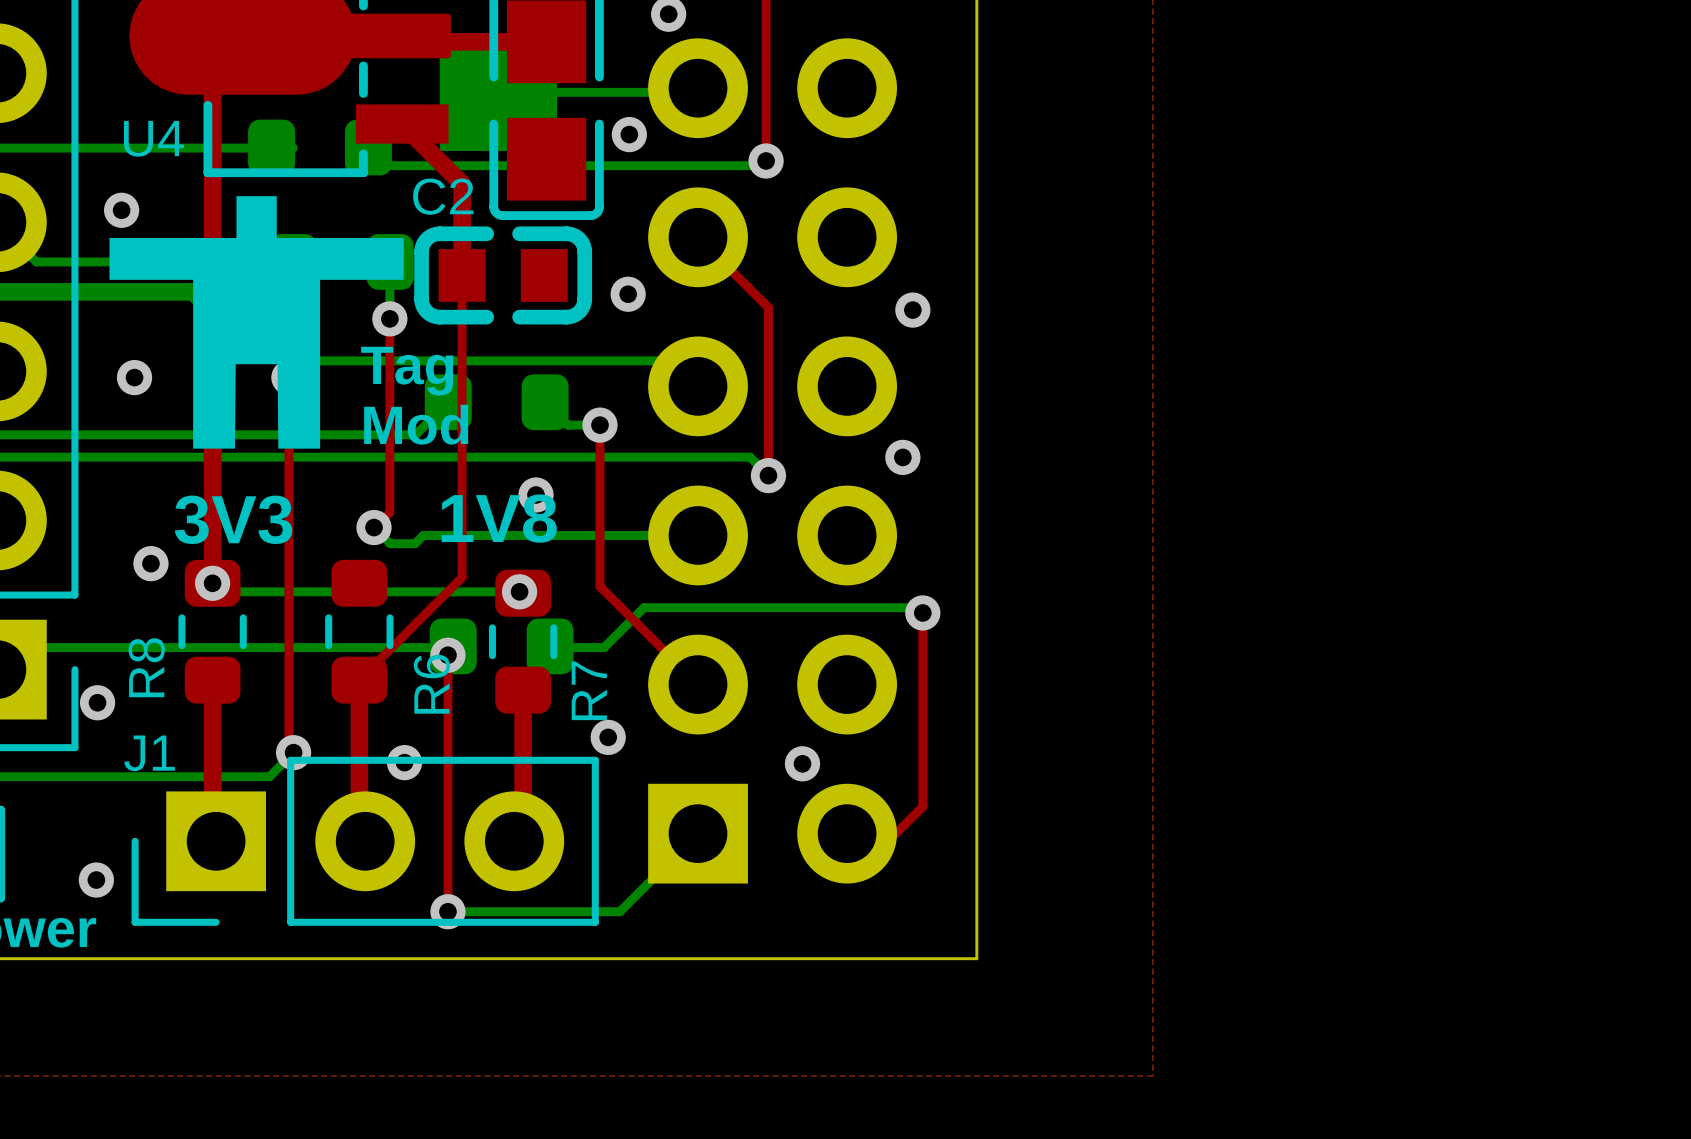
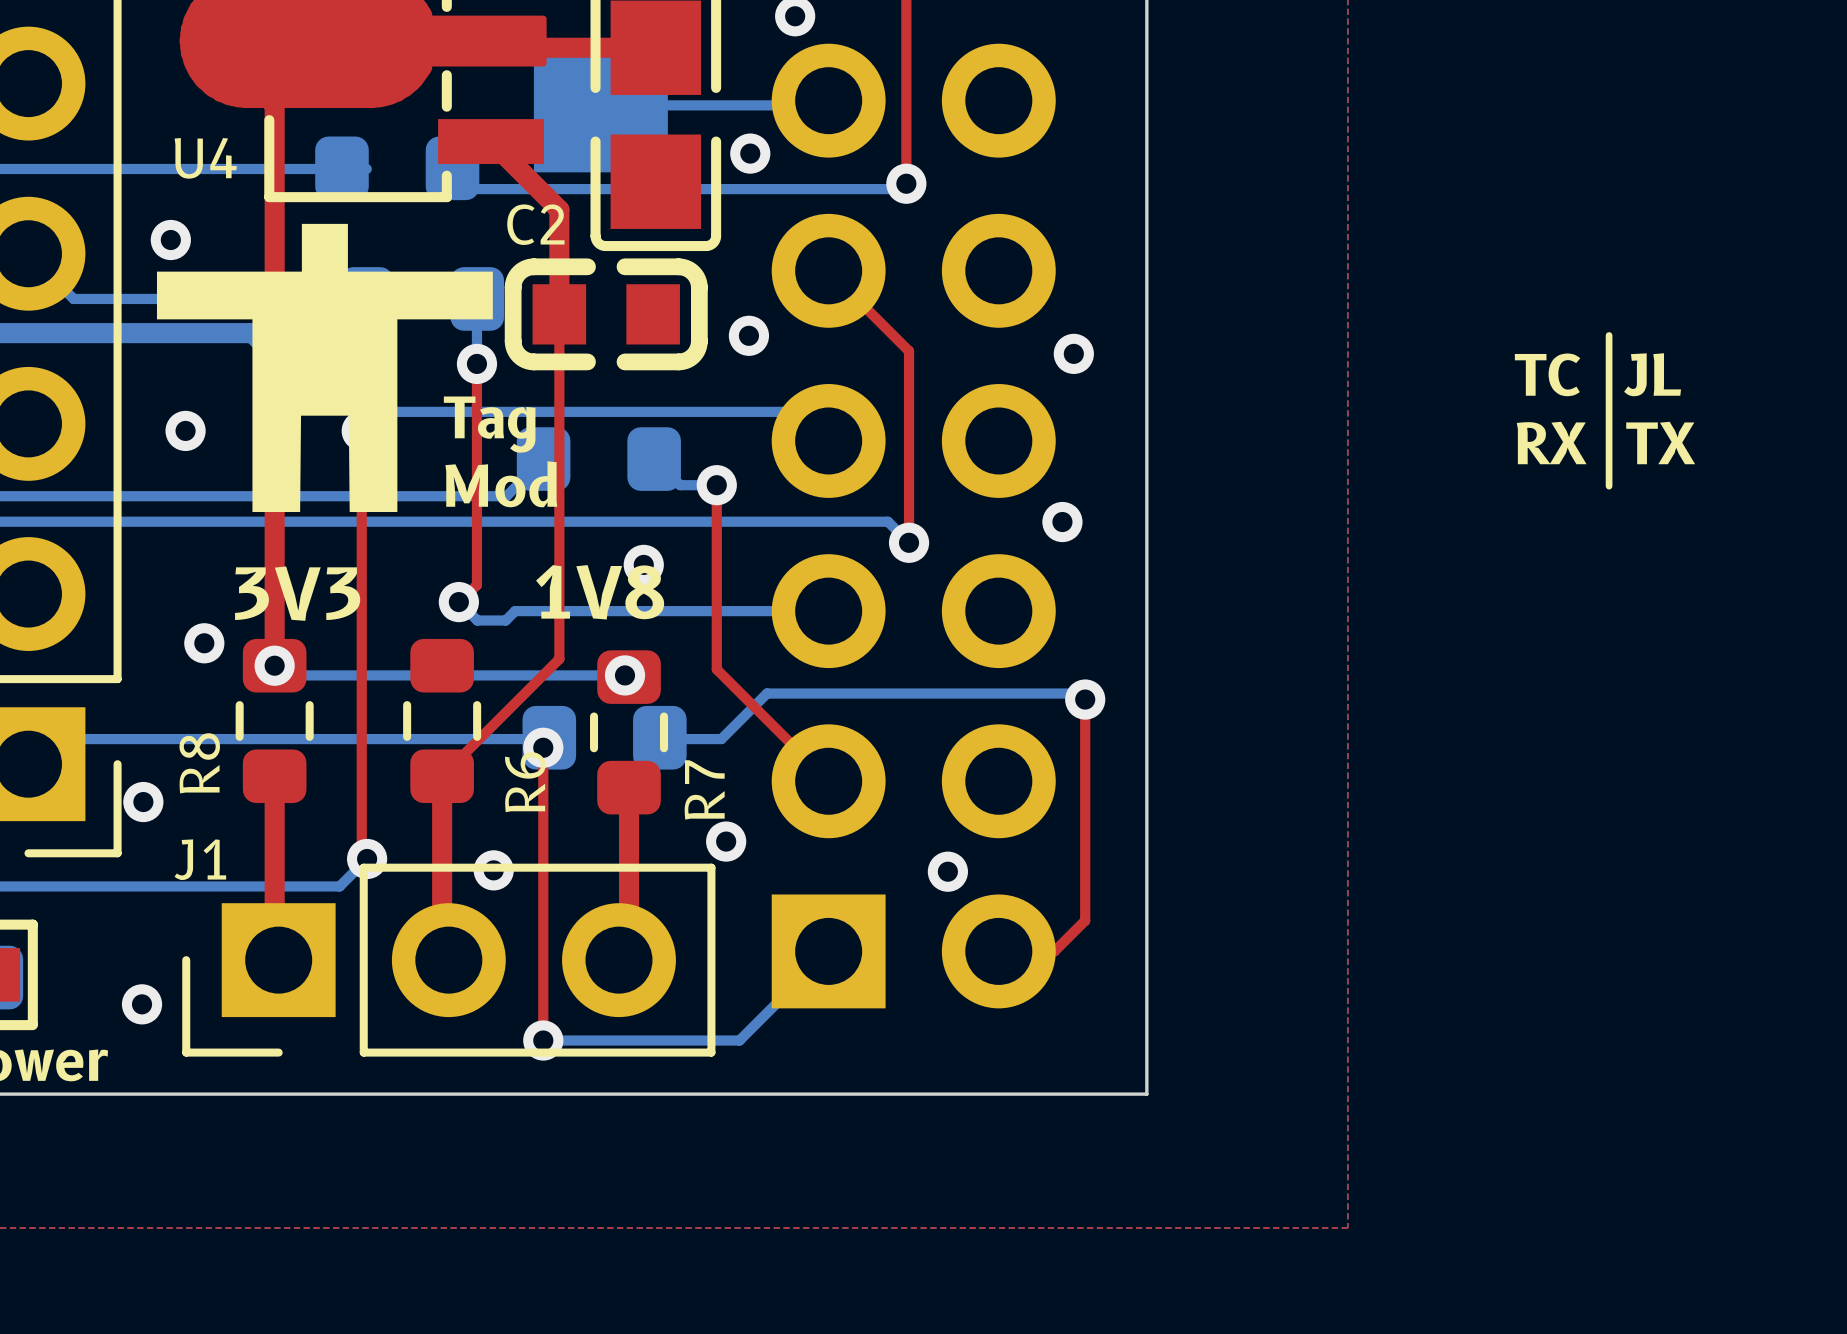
line: none -> (1609, 335) (1609, 486)
text: none -> TC (1547, 374)
text: none -> JL (1652, 374)
text: none -> RX (1551, 443)
text: none -> TX (1660, 443)

